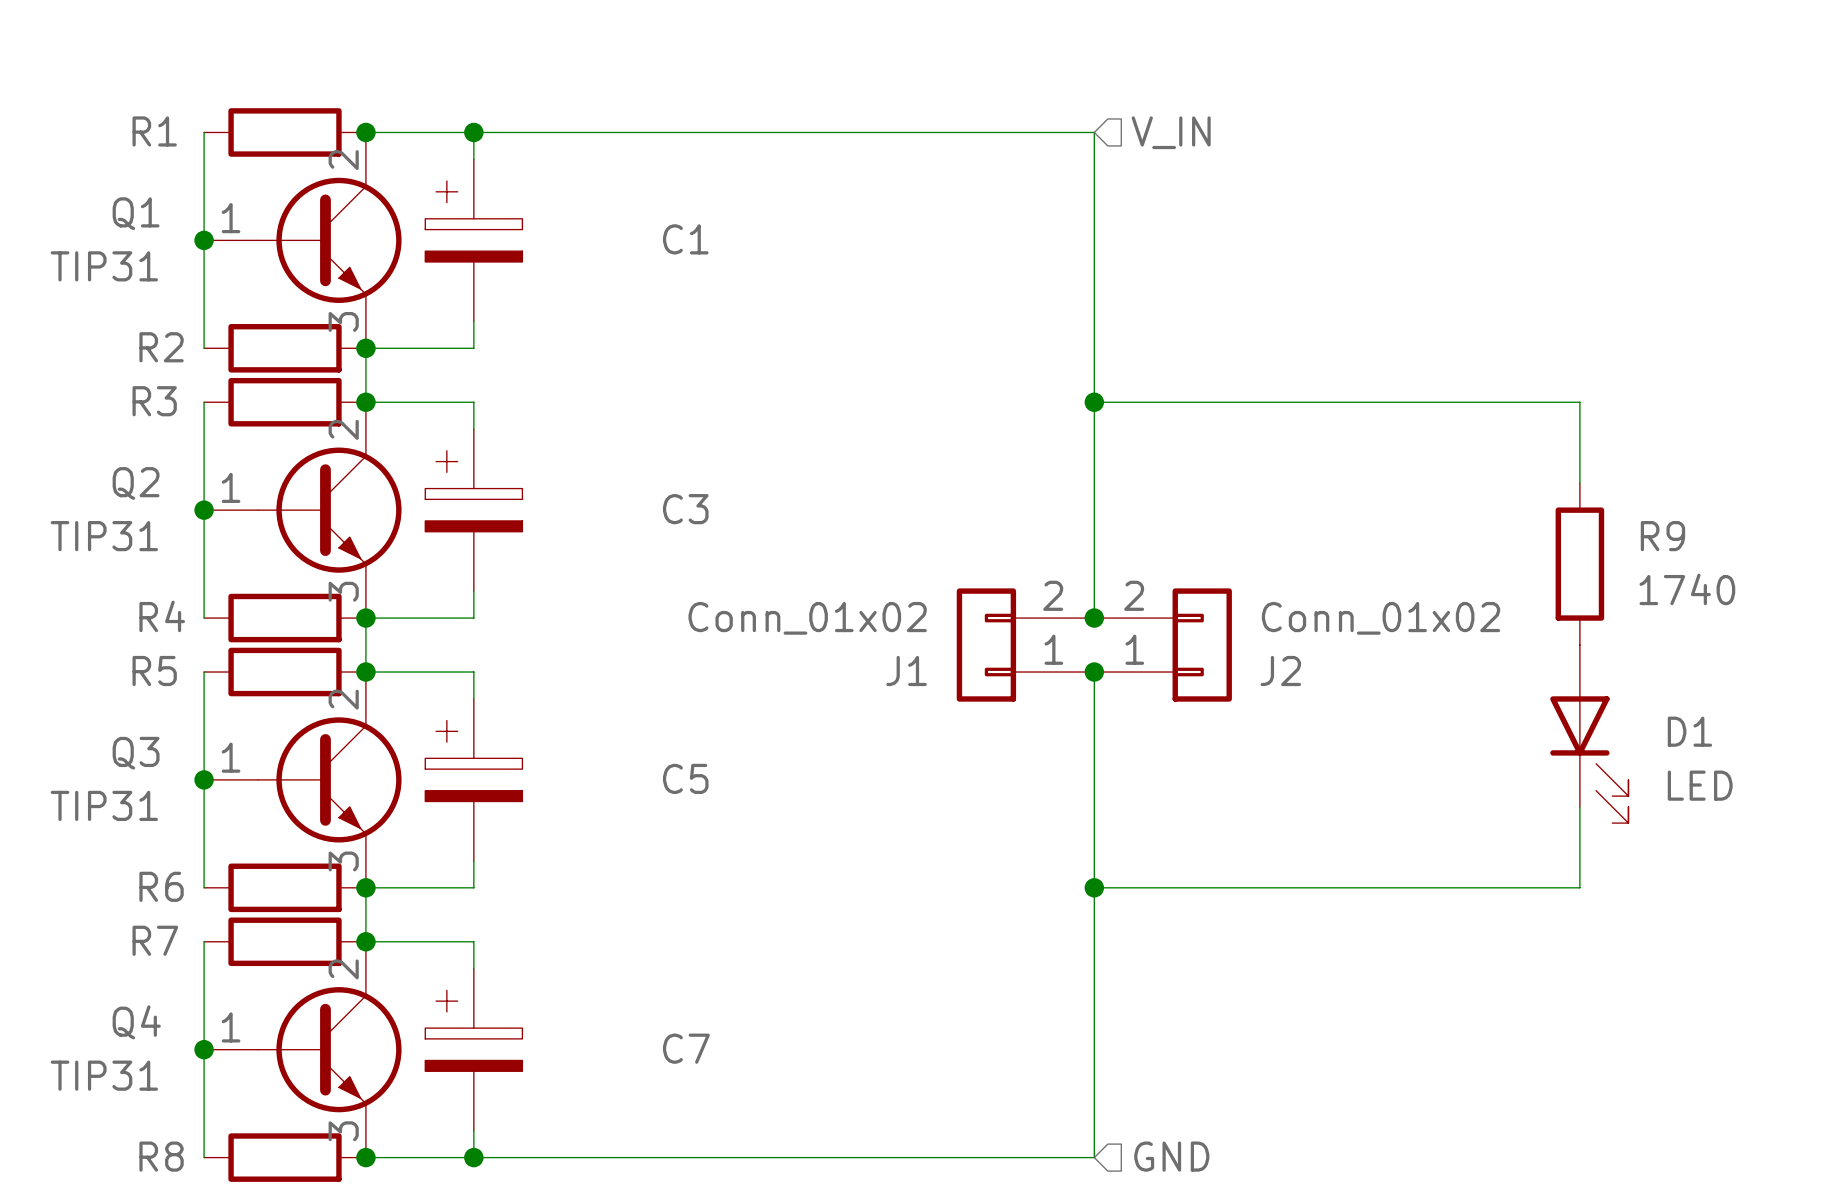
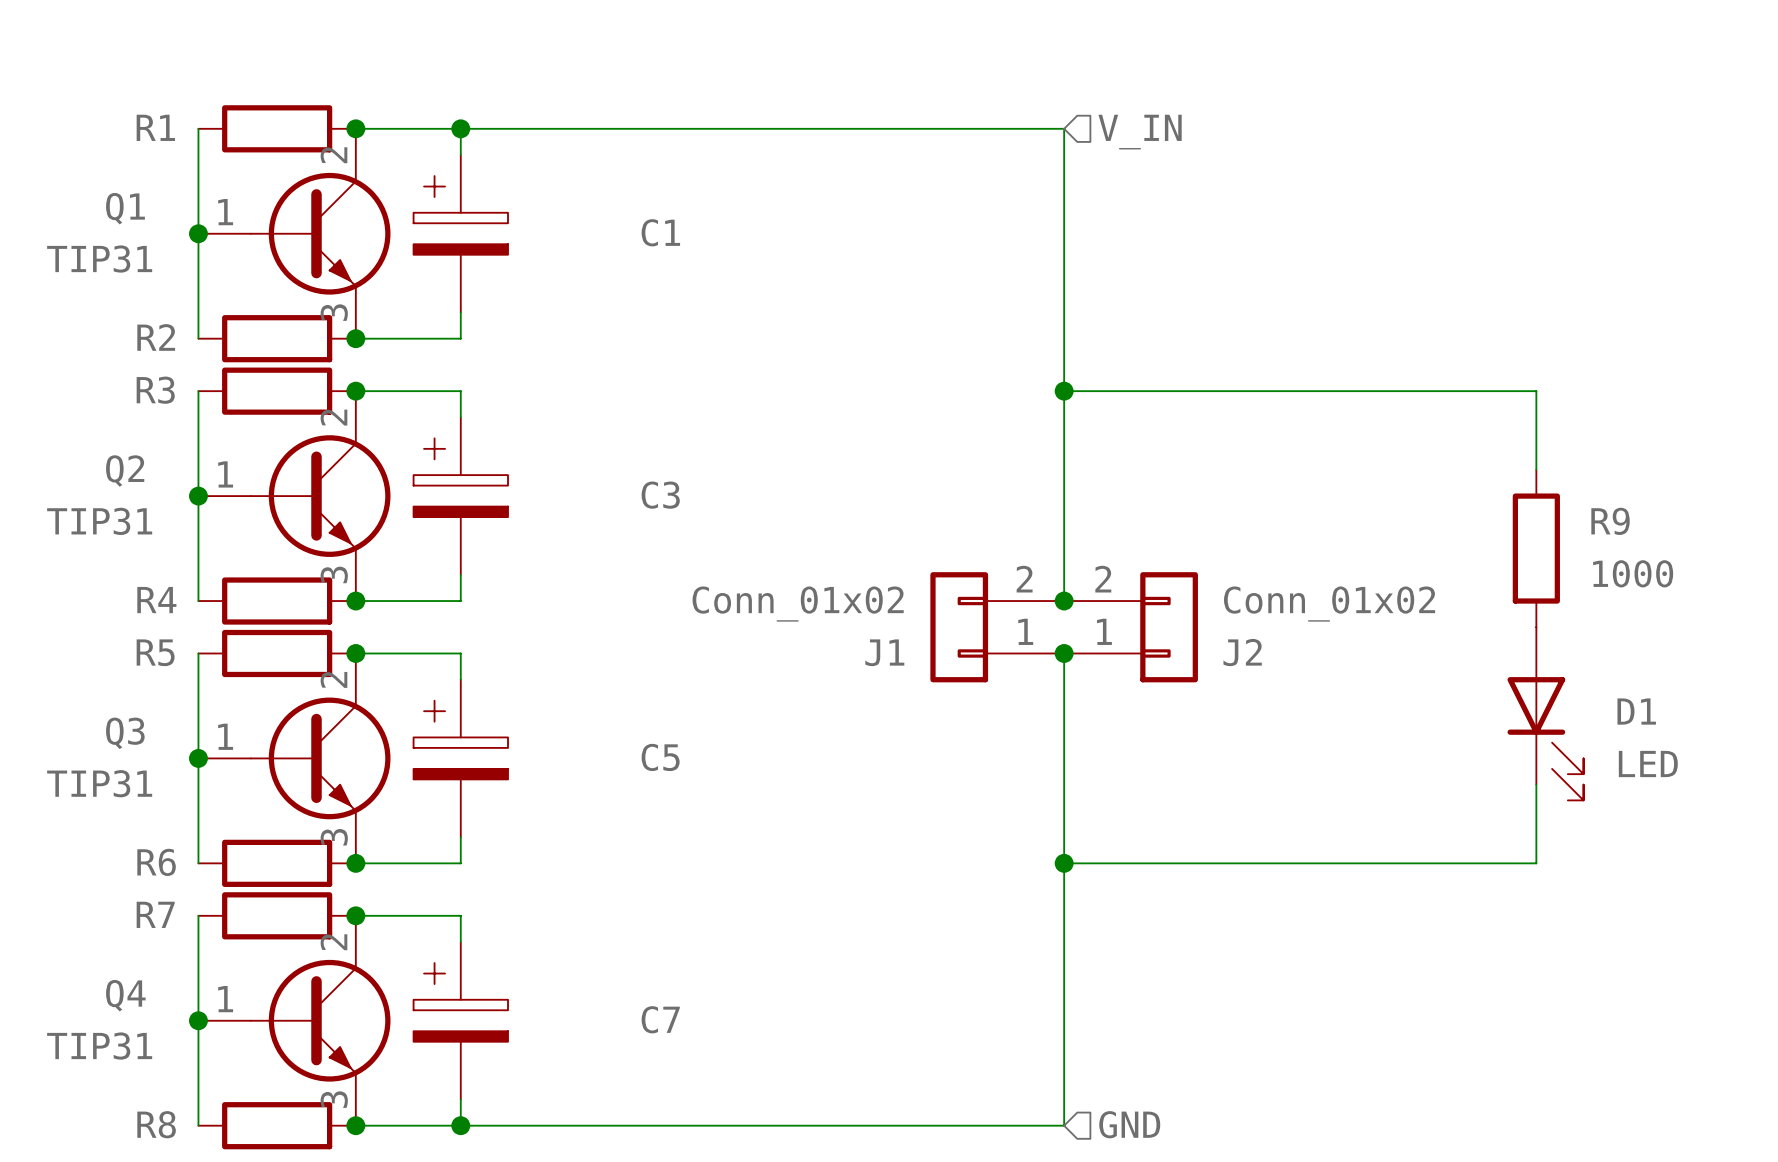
wire: (365, 348) (365, 402) -> none
R9 value: 1740 (1687, 589) -> 1000 (1633, 573)
wire: (365, 618) (365, 672) -> none
wire: (365, 887) (365, 941) -> none

